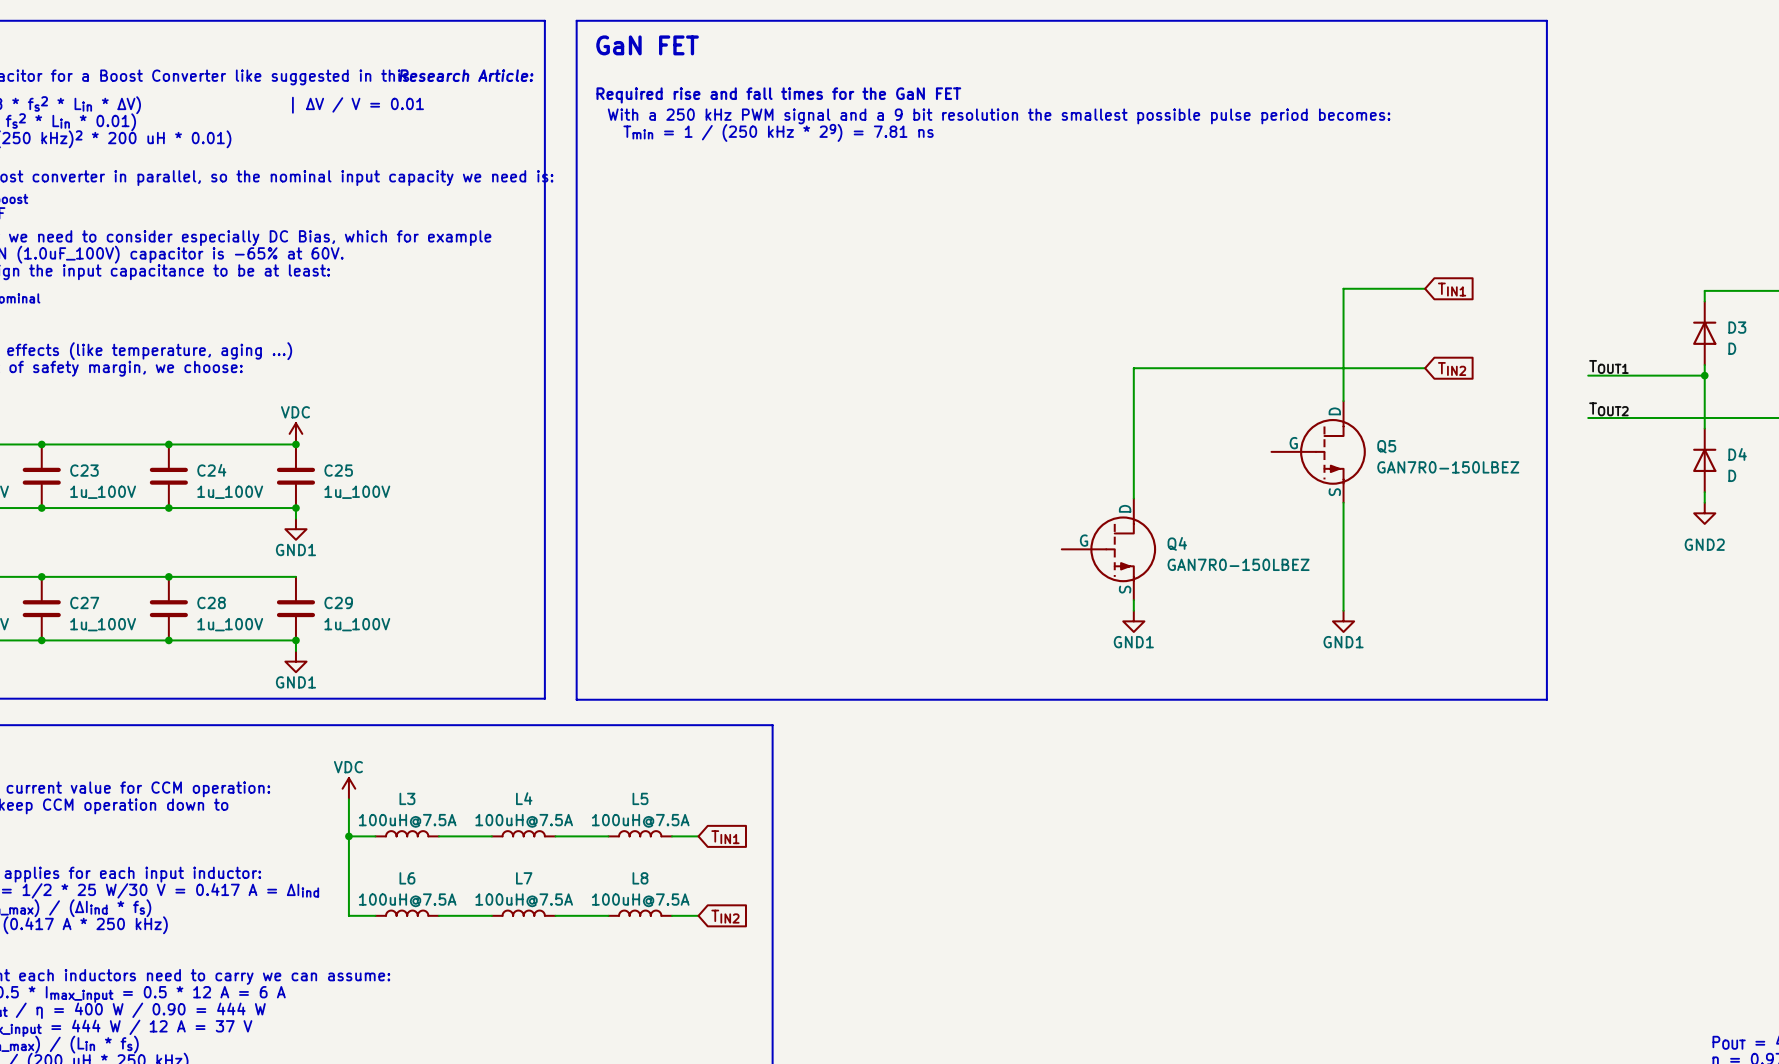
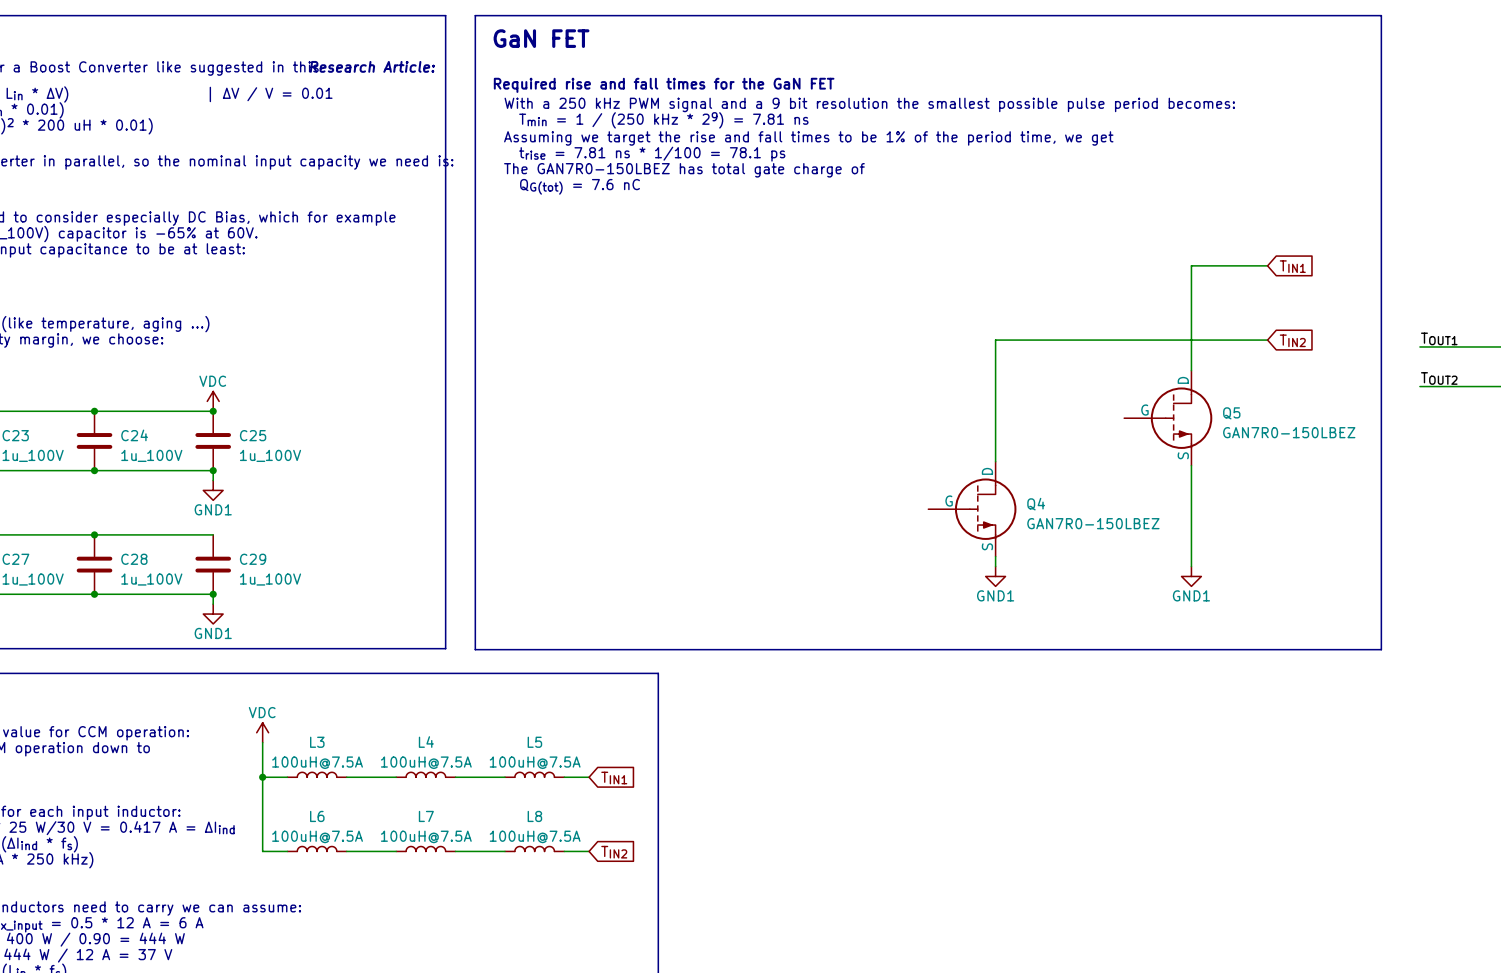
text: none -> Assuming we target the rise and fall times to be 1% of the period time, we get (808, 138)
text: none -> trise = 7.81 ns * 1/100 = 78.1 ps (652, 154)
text: none -> The GAN7R0-150LBEZ has total gate charge of (684, 170)
text: none -> QG(tot) = 7.6 nC (580, 186)

